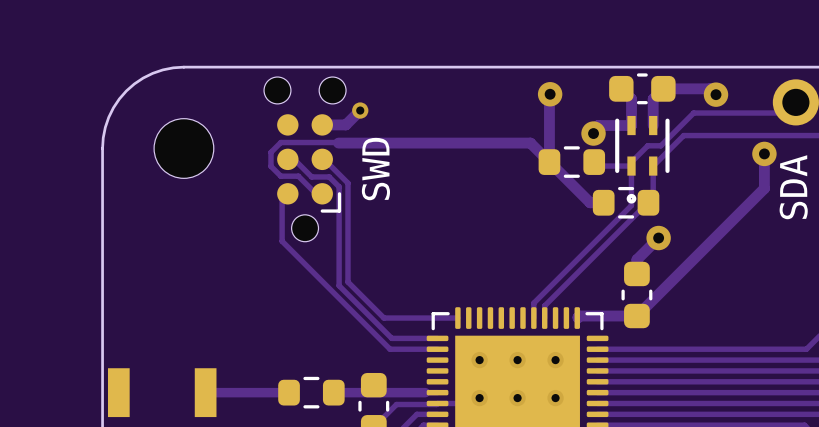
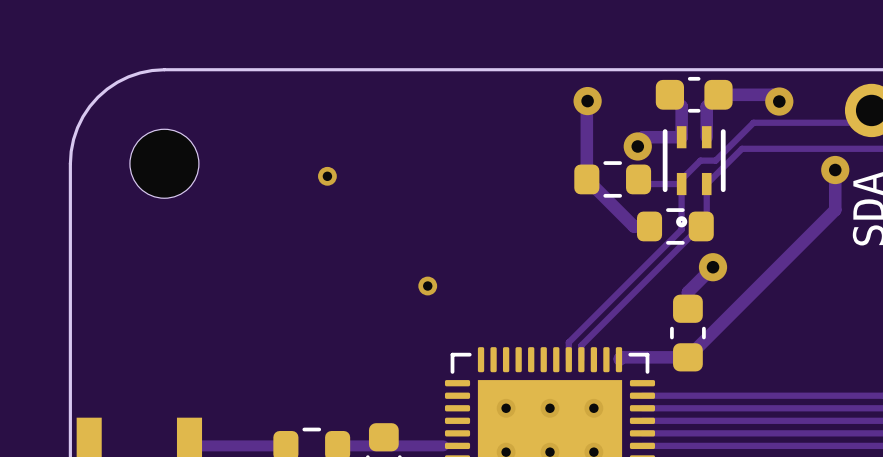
track: (360, 110) (345, 124) (322, 124) -> none
via position: (360, 110) -> (327, 176)
track: (287, 159) (294, 159) (311, 176) (329, 176) (339, 186) (339, 285) (391, 338) (437, 338) -> none
part: (305, 159) -> none
track: (322, 159) (347, 183) (347, 282) (383, 318) (457, 318) -> none
track: (549, 162) (530, 143) (280, 142) (270, 152) (270, 166) (280, 176) (298, 176) (316, 193) (322, 193) -> none
text: SWD (375, 169) -> none
track: (287, 193) (282, 199) (282, 241) (390, 349) (437, 349) -> none
via: none -> (427, 286)

